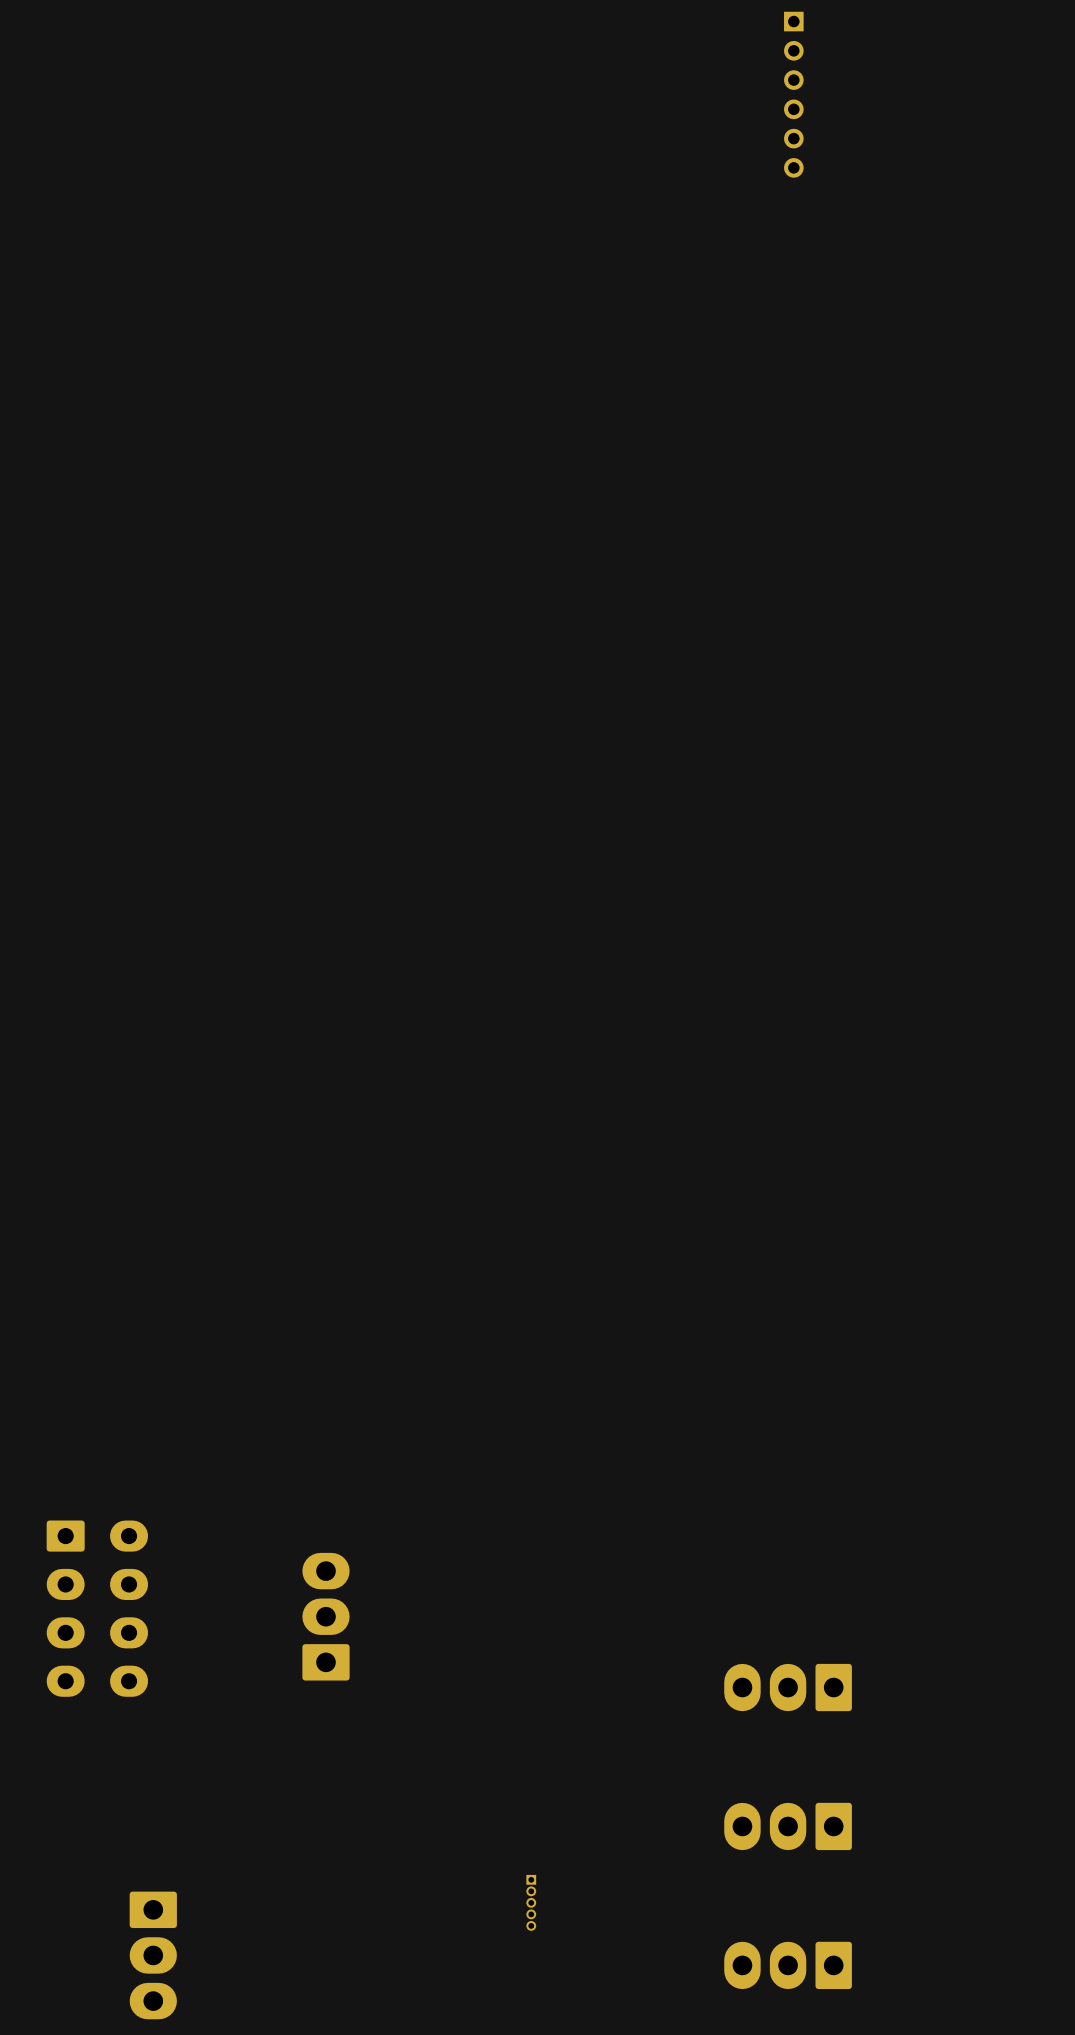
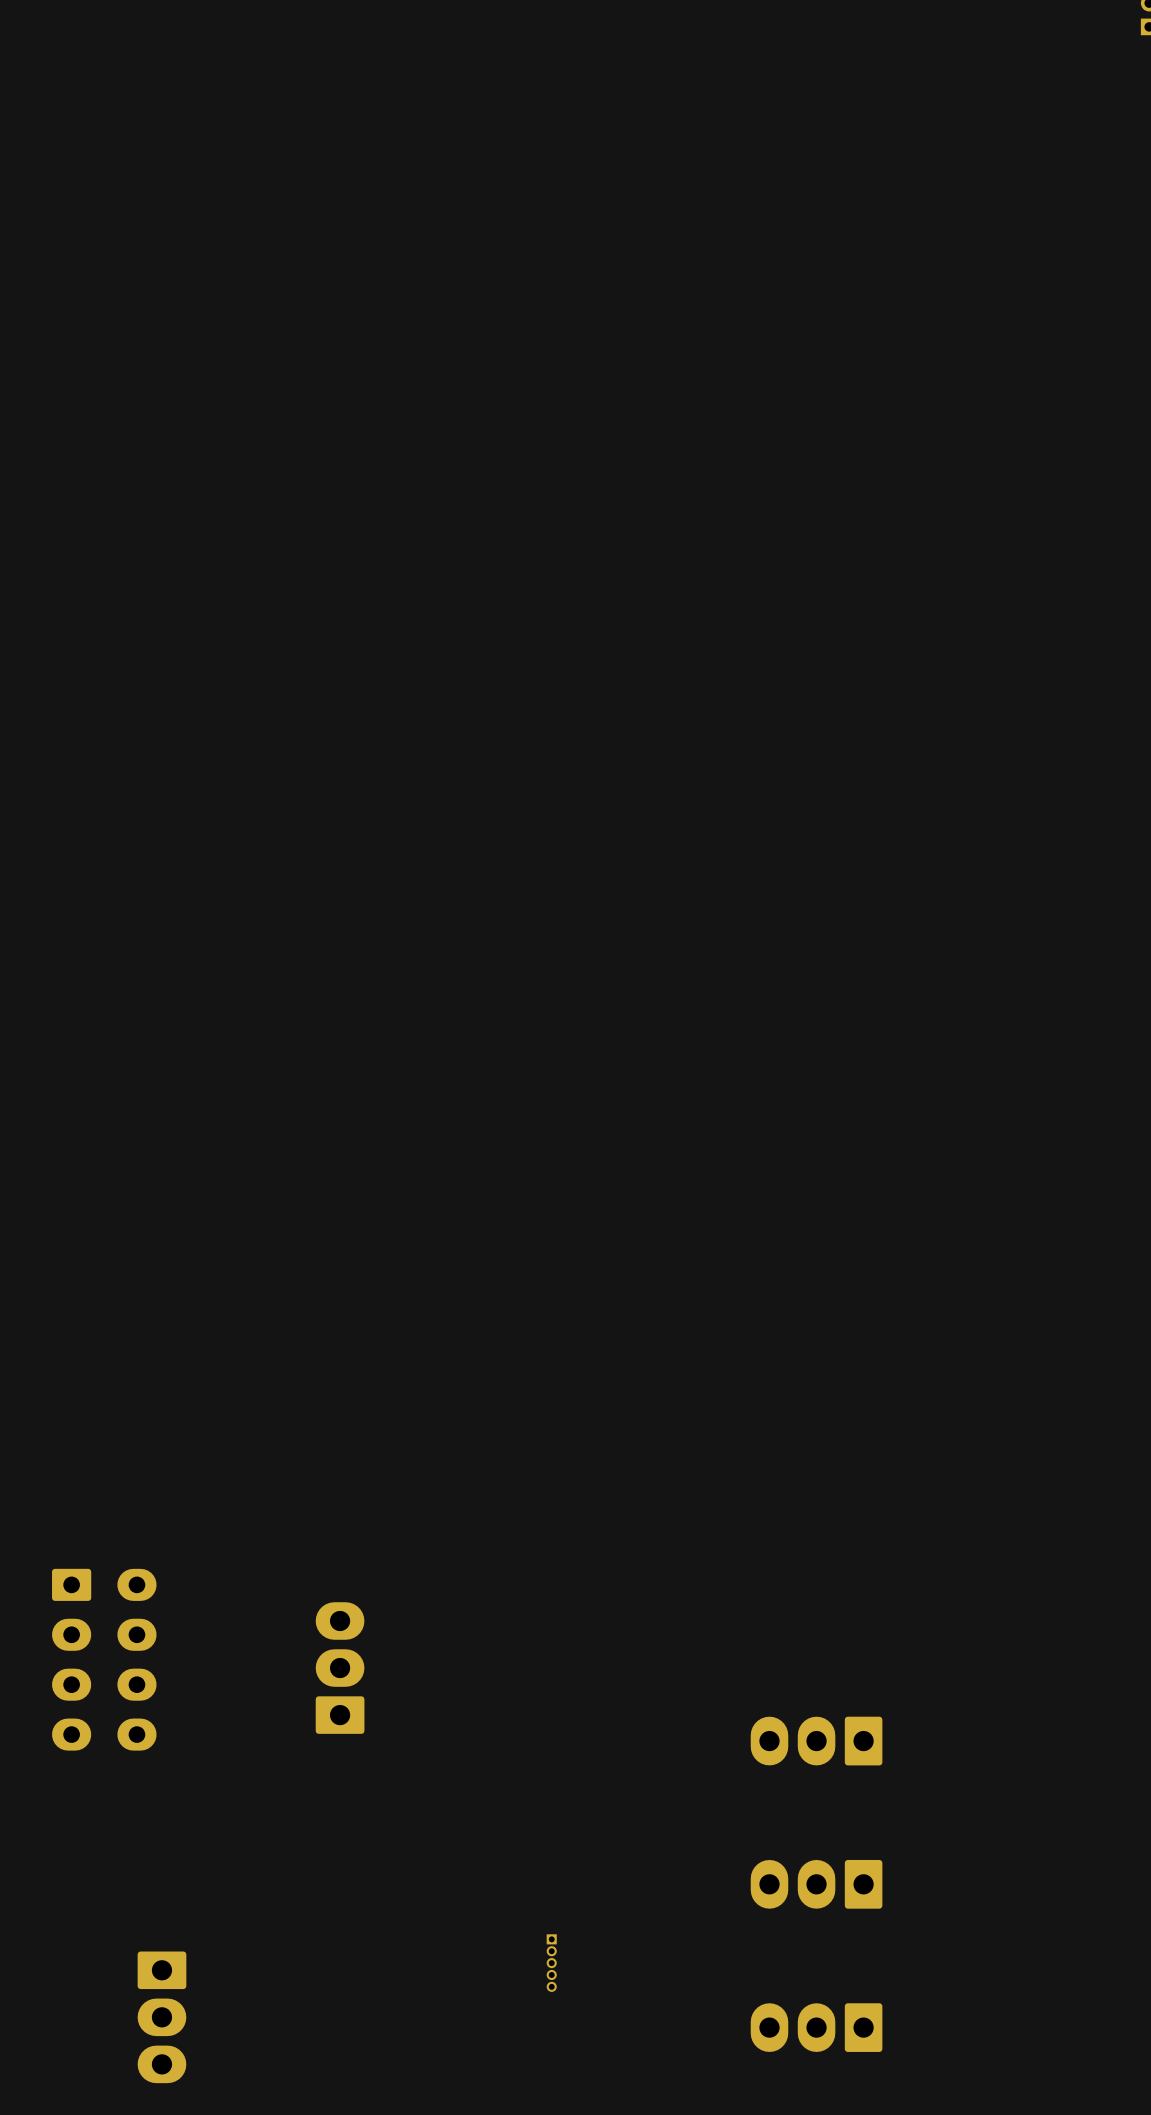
part: (793, 94) -> none

